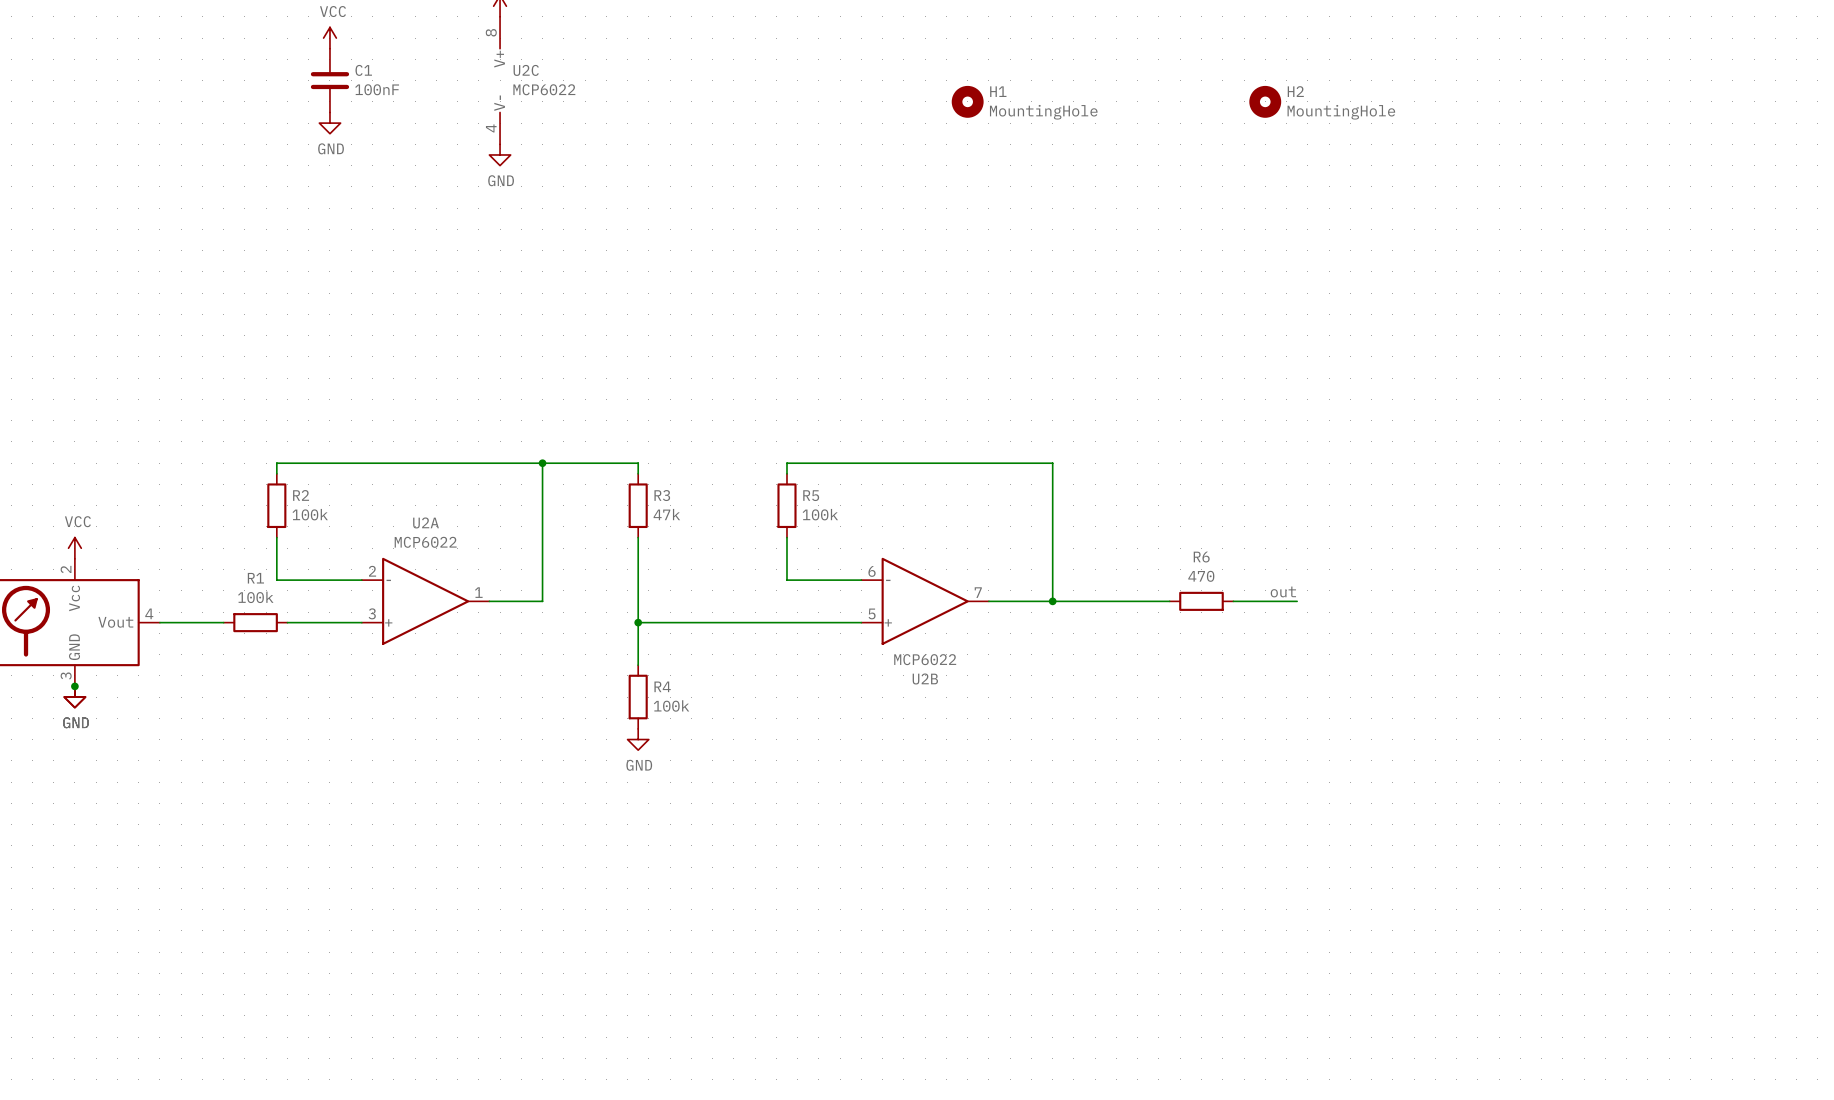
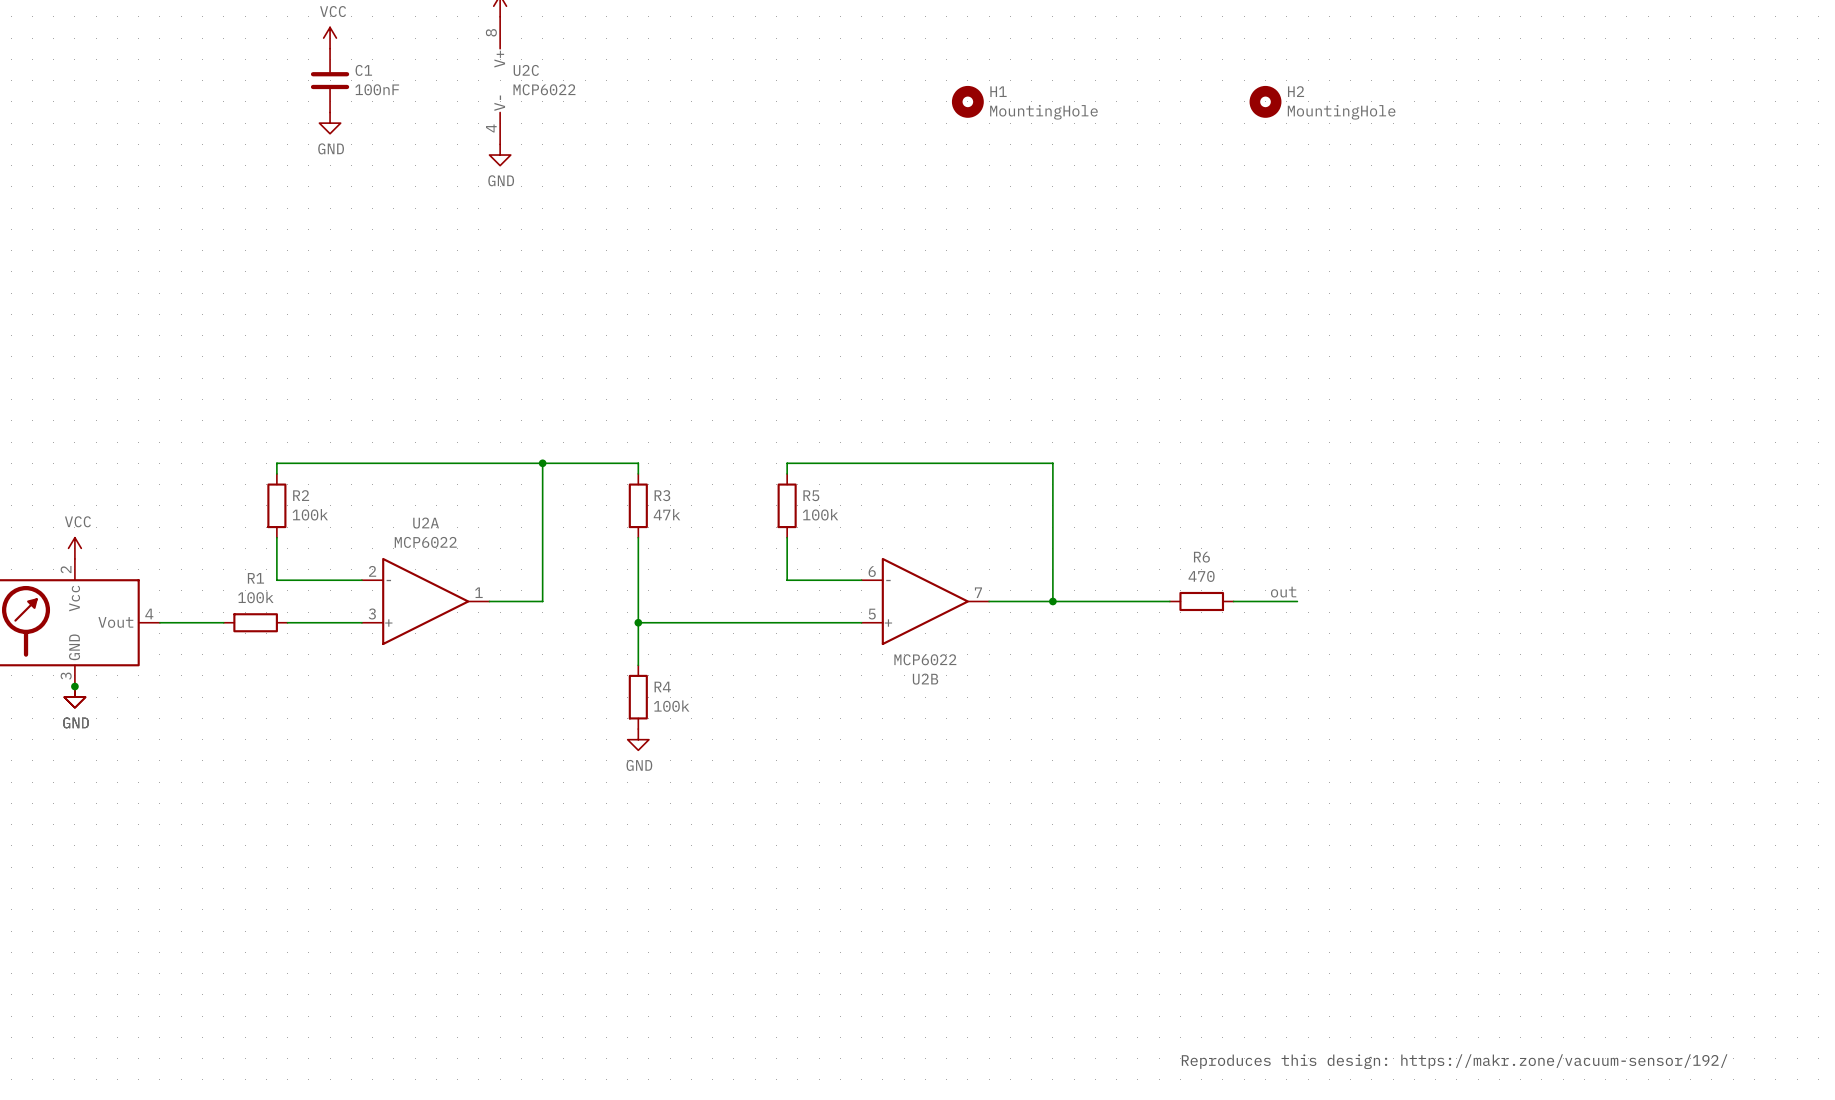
text: none -> Reproduces this design: https://makr.zone/vacuum-sensor/192/ (1454, 1061)

